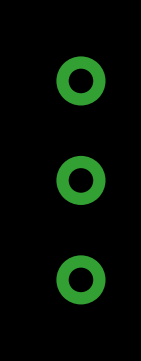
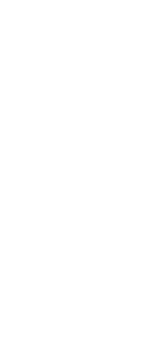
part: (80, 80) -> none
part: (80, 180) -> none
part: (80, 279) -> none

